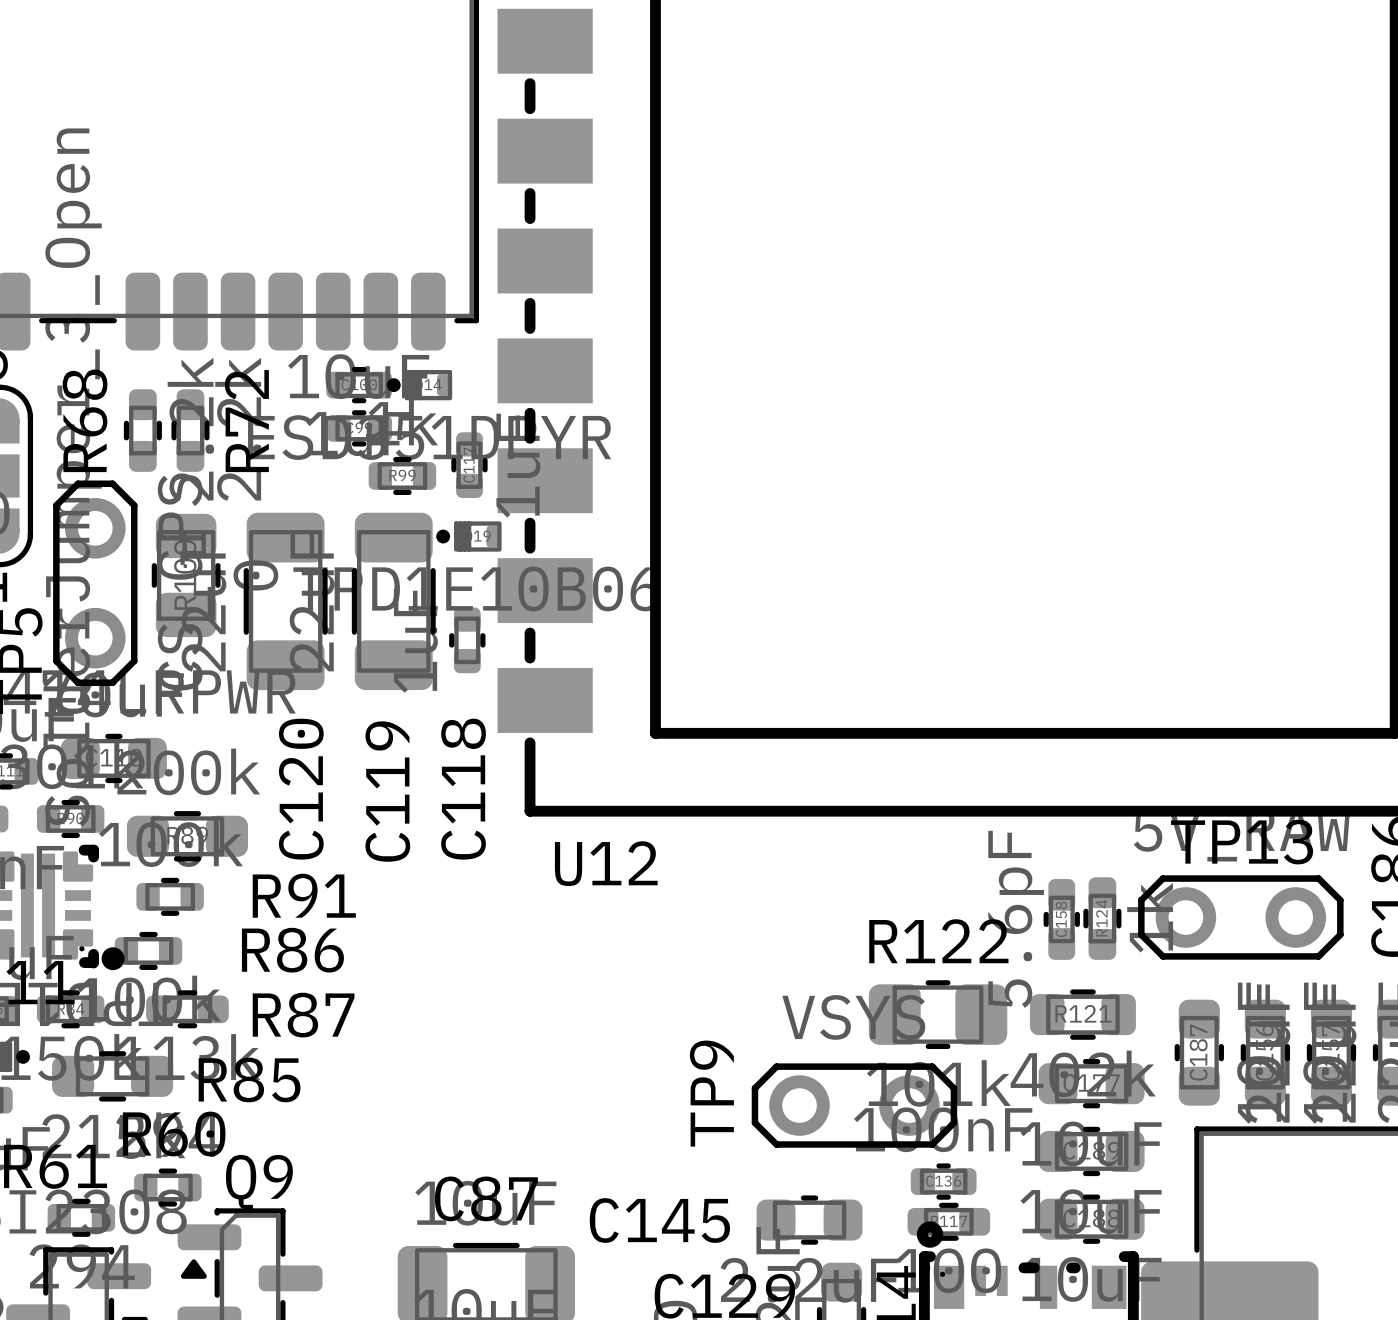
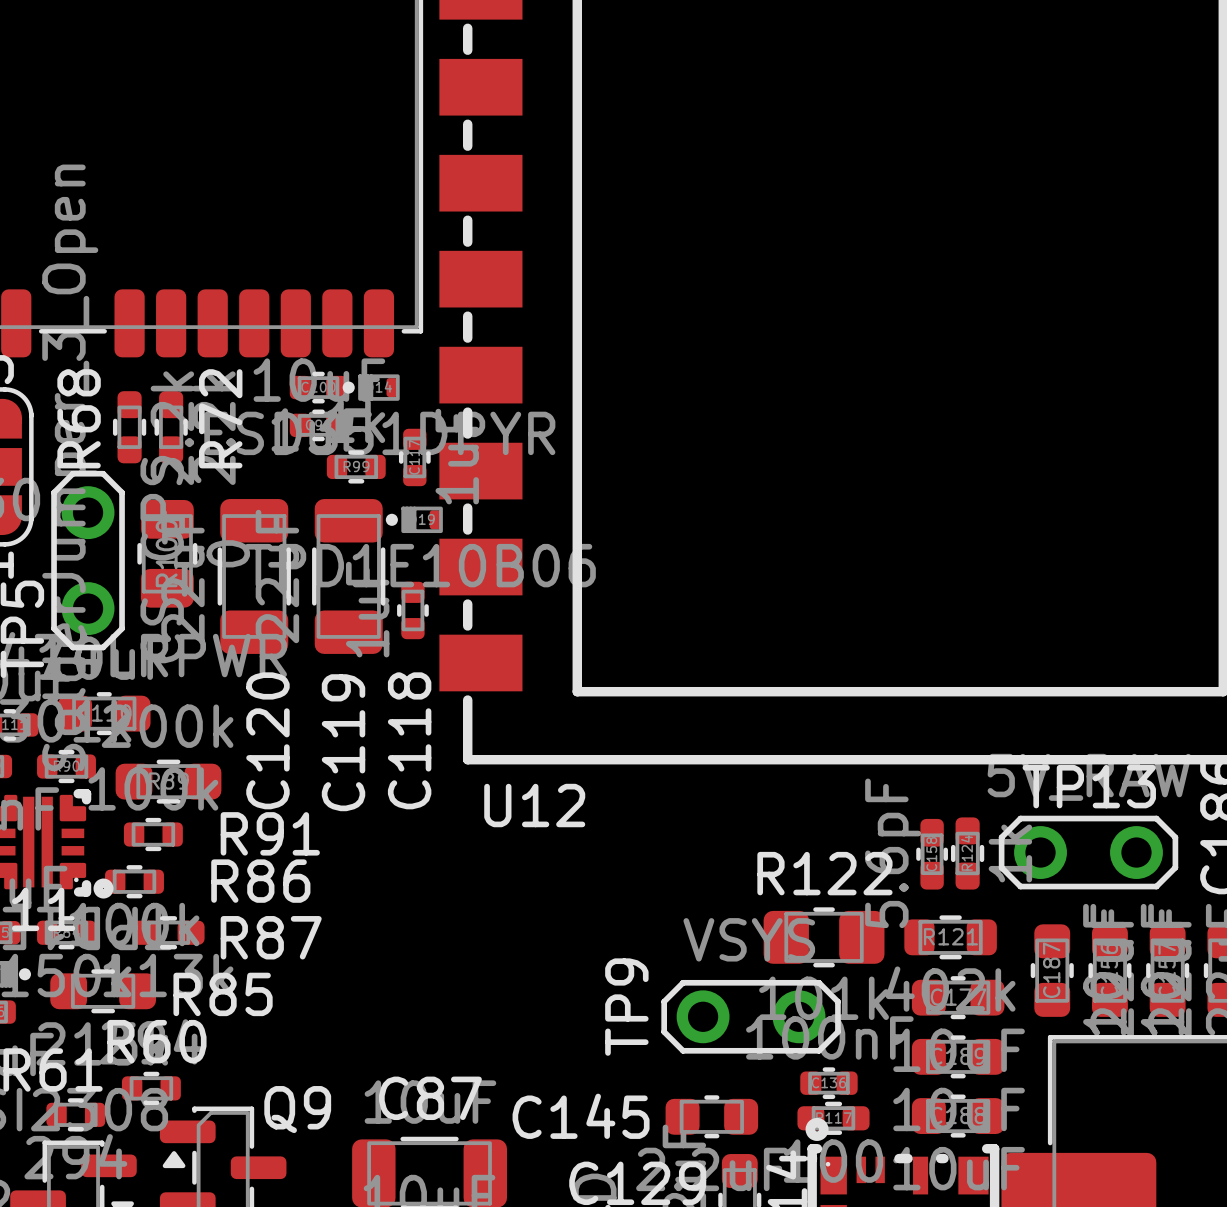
Q9 name position: Q9 (259, 1181) -> Q9 (297, 1109)

